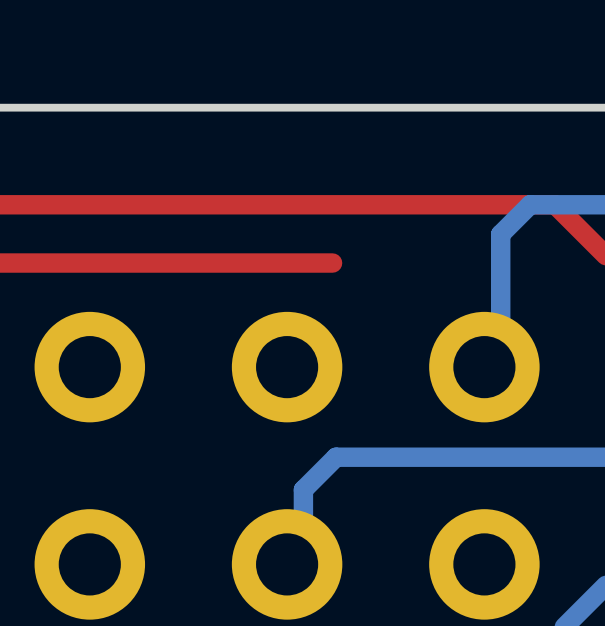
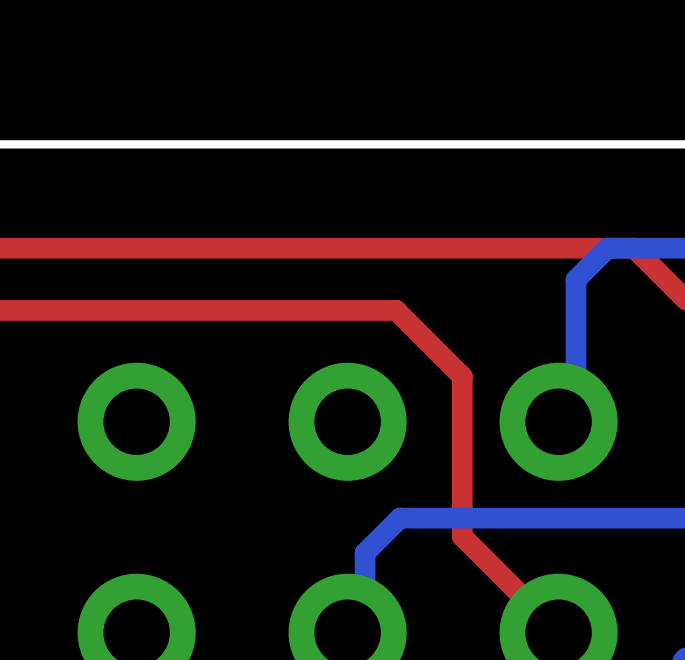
top track: none -> (396, 310) (462, 376) (462, 536) (558, 632)

